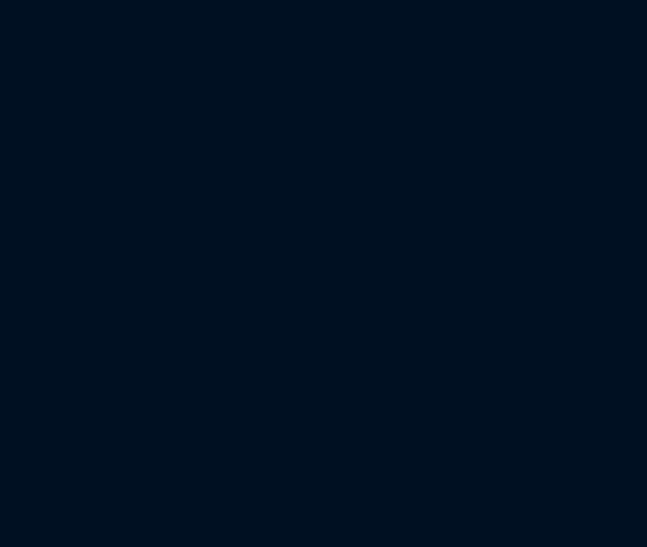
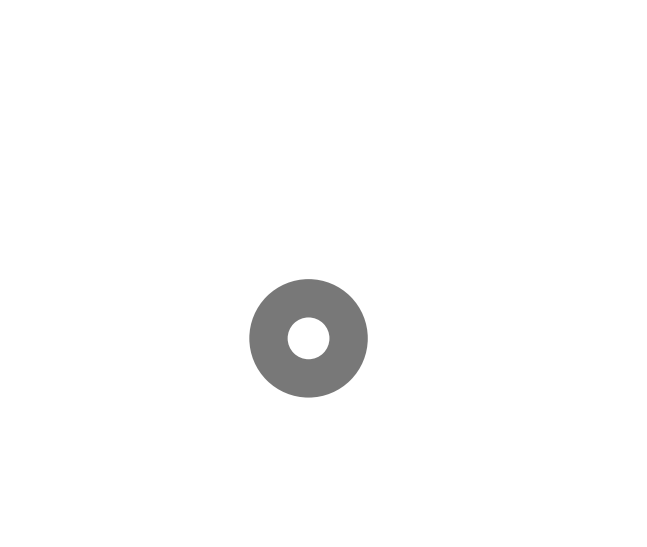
via: none -> (308, 338)

